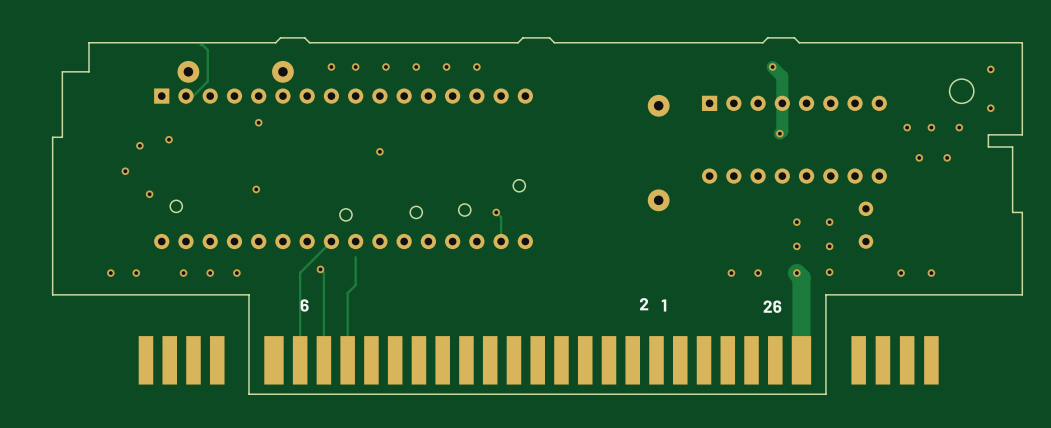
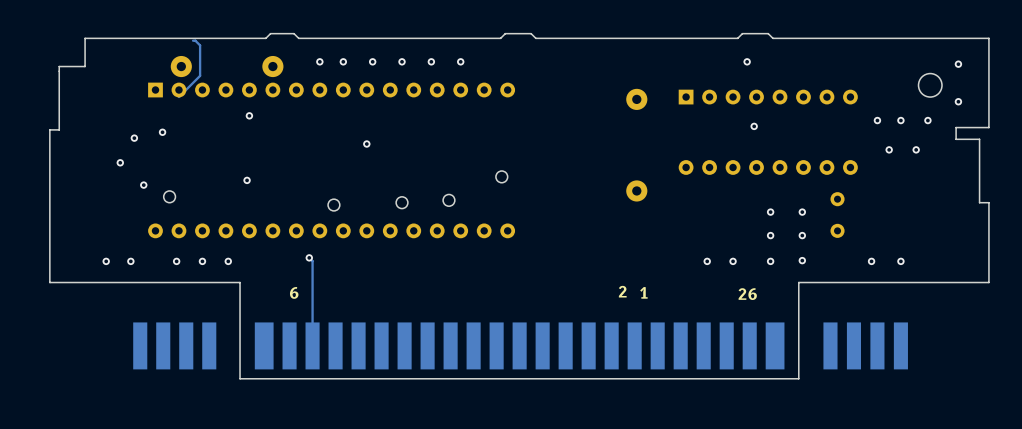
track: (772, 66) (782, 76) (782, 131) (779, 133) -> none
track: (496, 212) (501, 217) (501, 241) -> none
via: (496, 212) -> none
track: (331, 241) (300, 272) (300, 360) -> none
track: (355, 257) (355, 285) (347, 293) (347, 360) -> none
track: (796, 273) (801, 277) (801, 360) -> none

